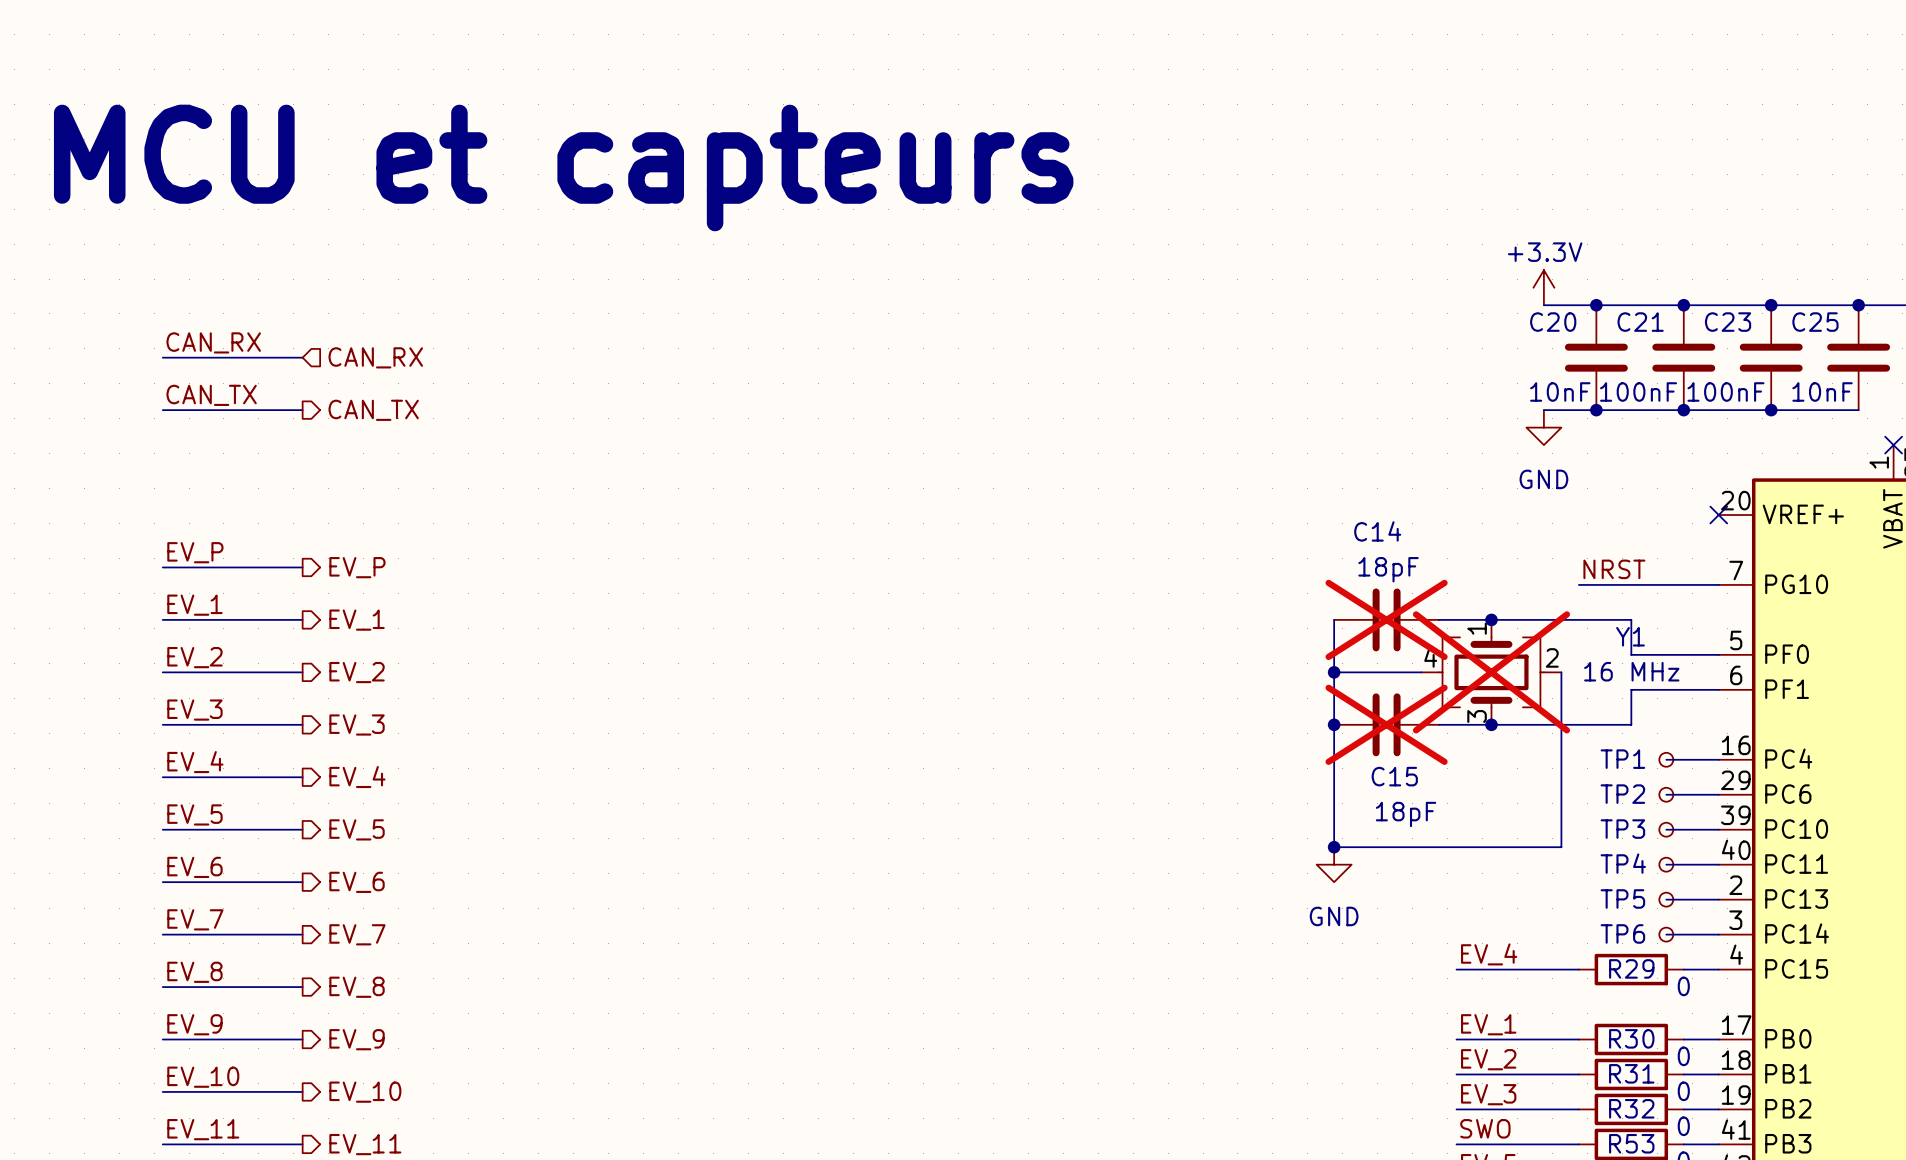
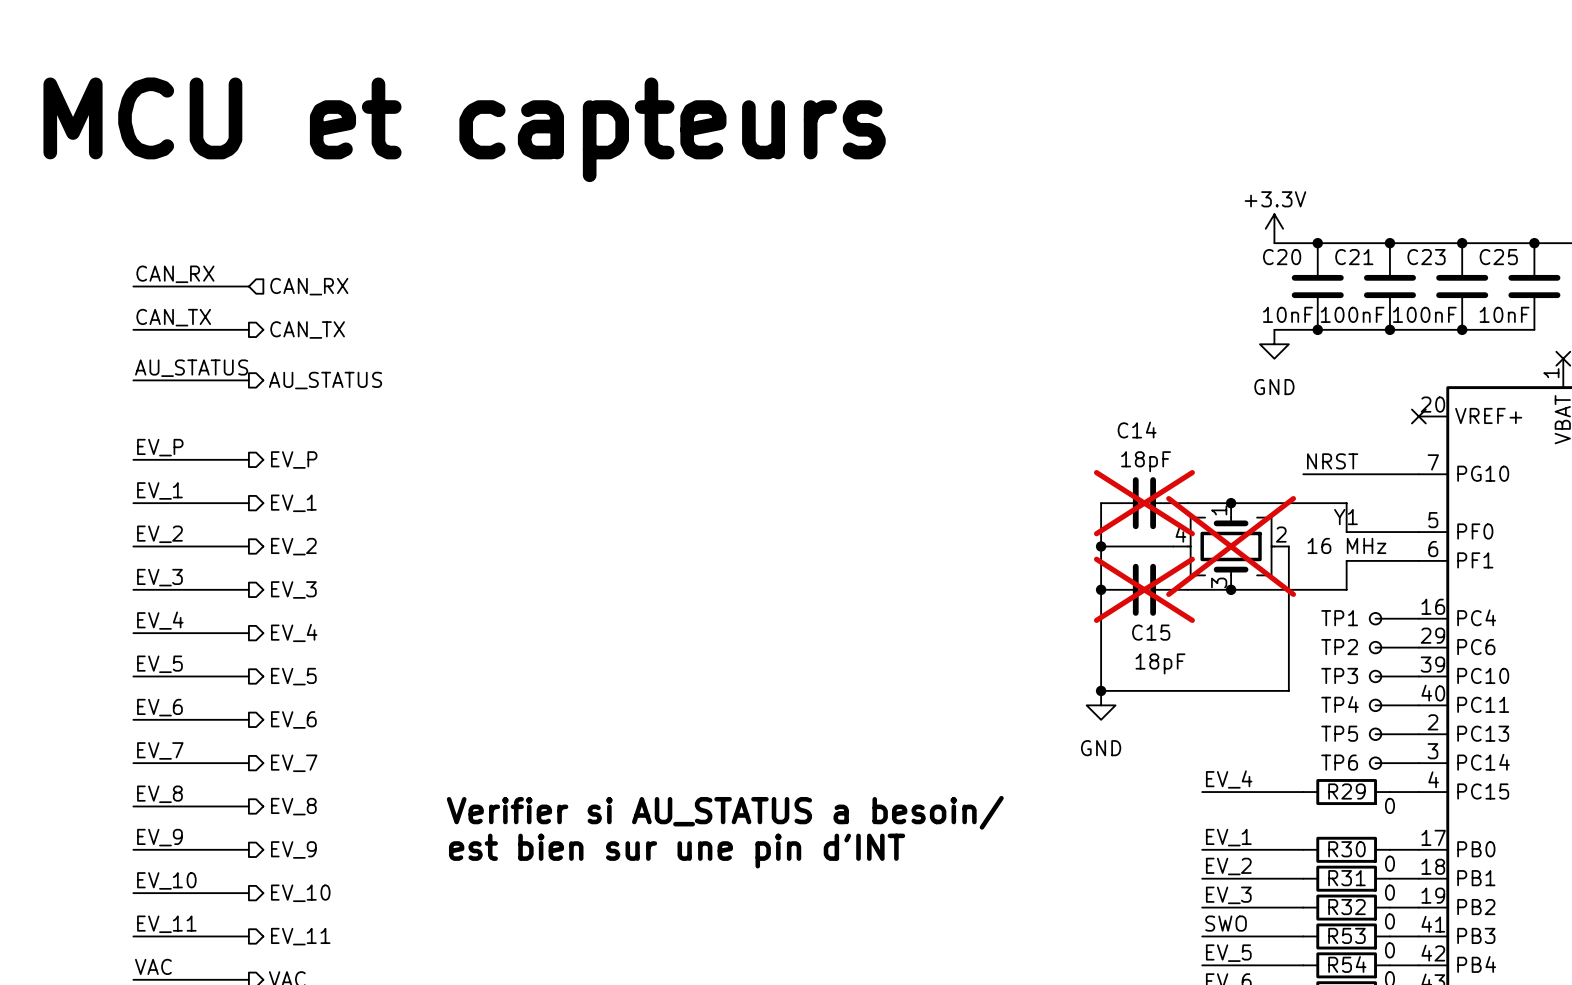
label: none -> AU_STATUS (191, 368)
wire: none -> (133, 380) (248, 380)
hierarchical label: none -> AU_STATUS (325, 380)
text: none -> Verifier si AU_STATUS a besoin/ (725, 812)
text: none -> est bien sur une pin d'INT (677, 851)

